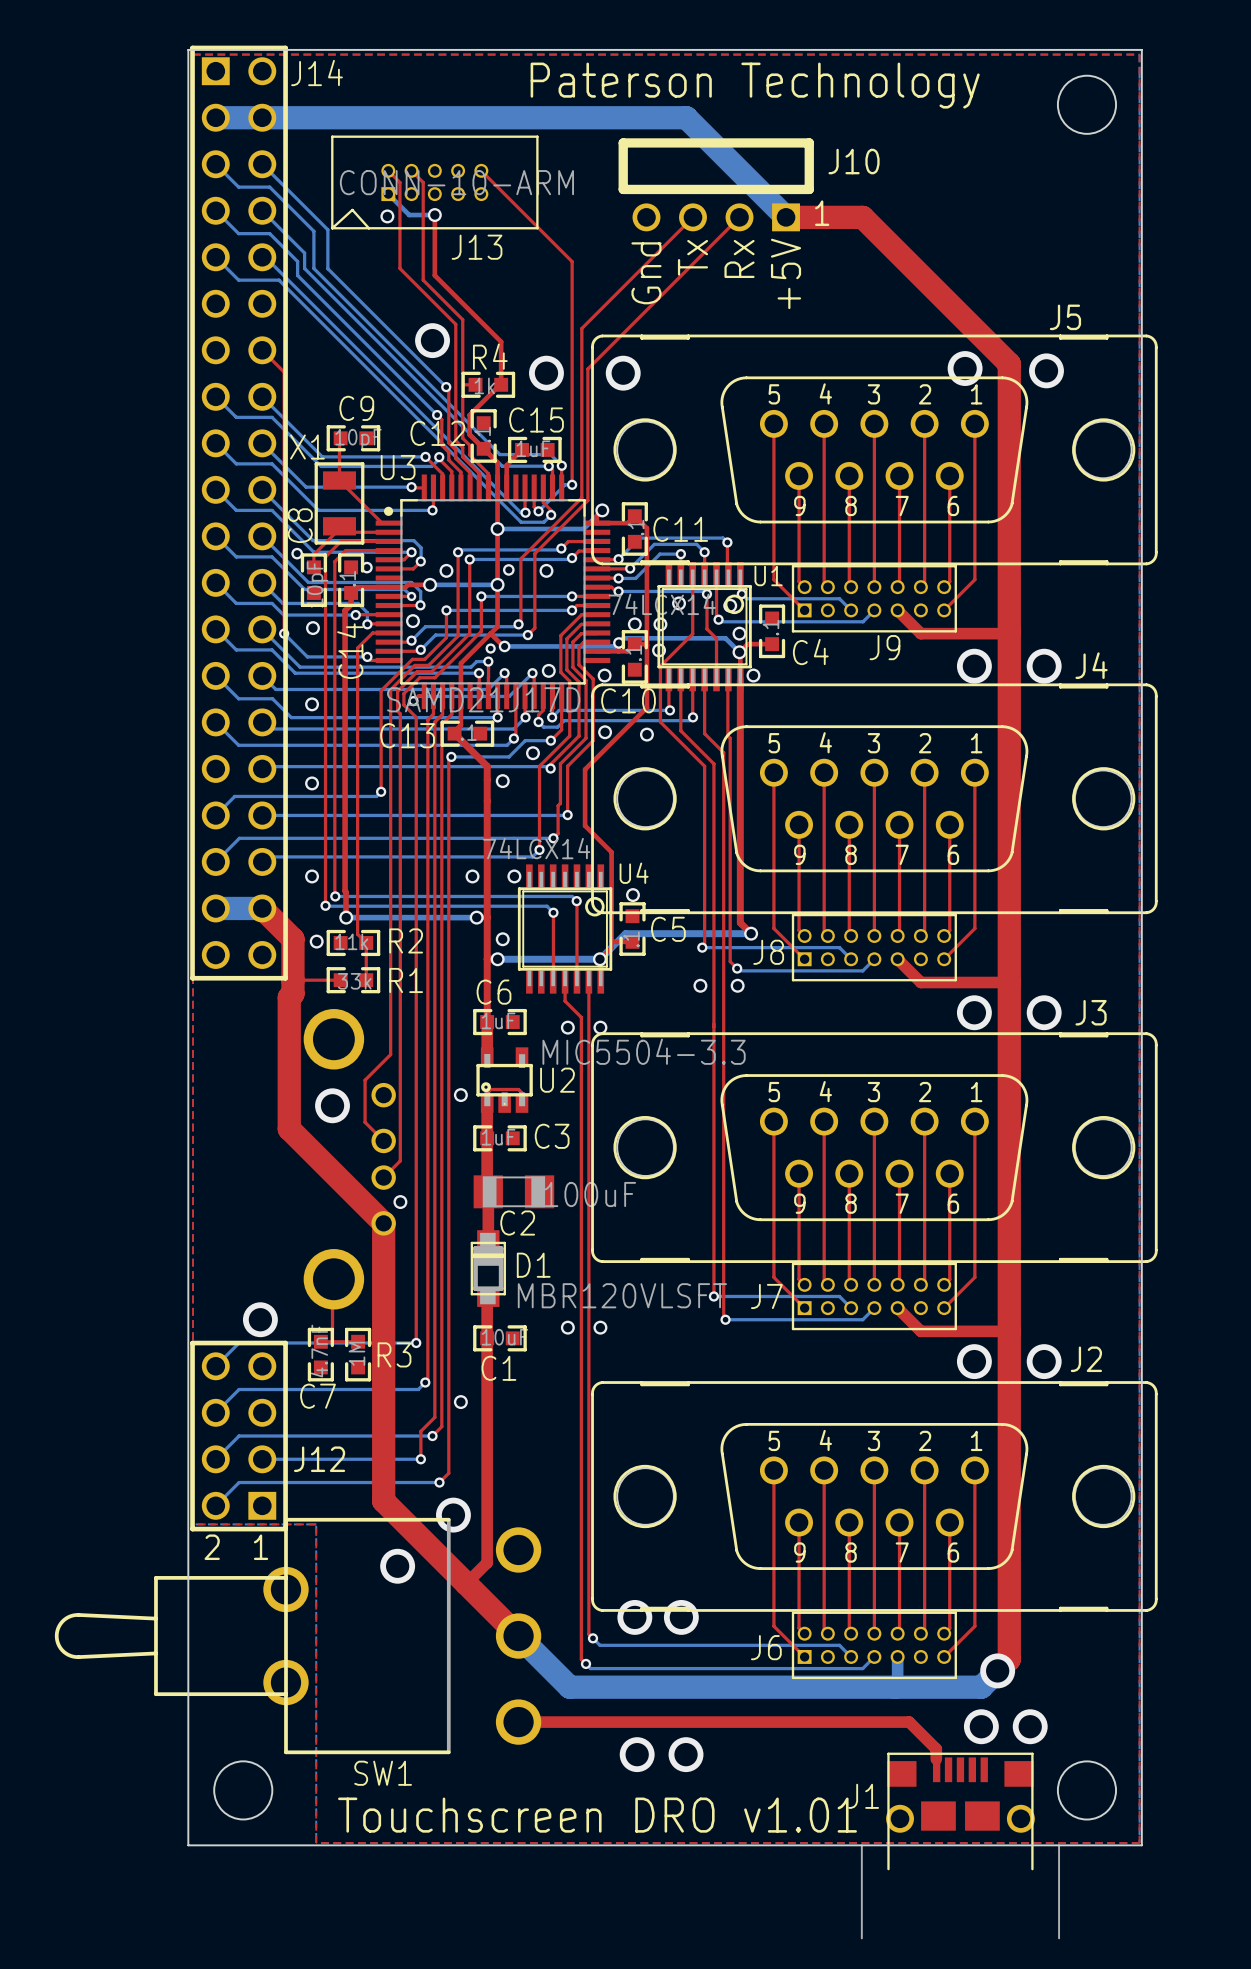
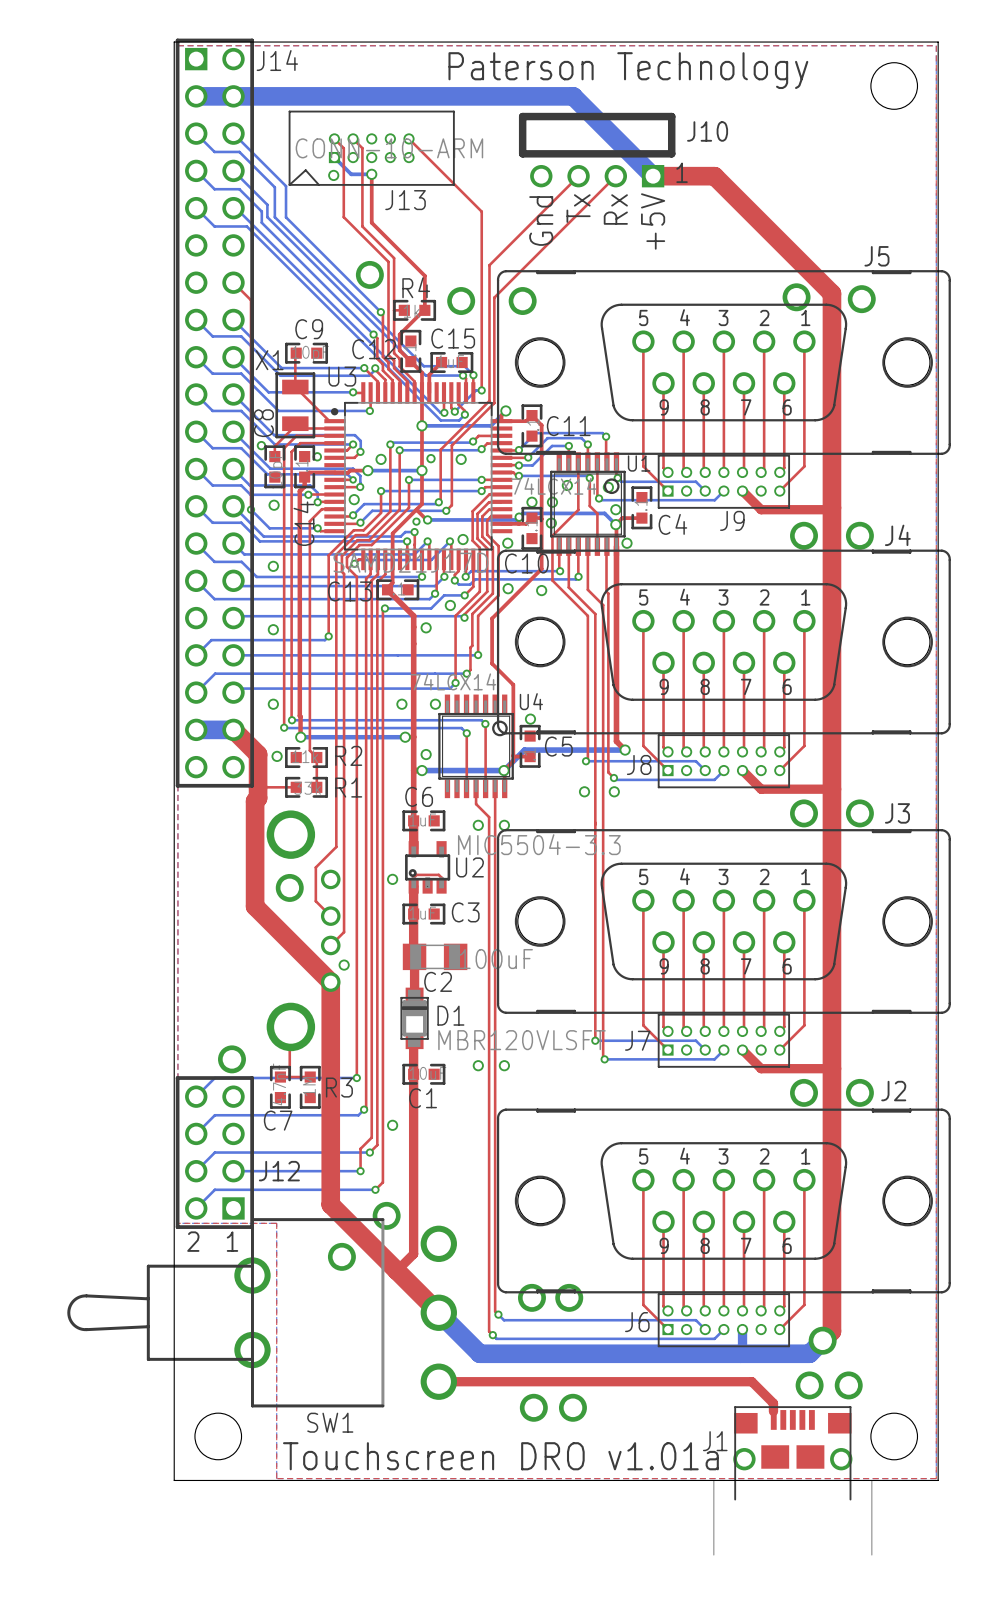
text: Touchscreen DRO v1.01 (597, 1815) -> Touchscreen DRO v1.01a (500, 1456)

